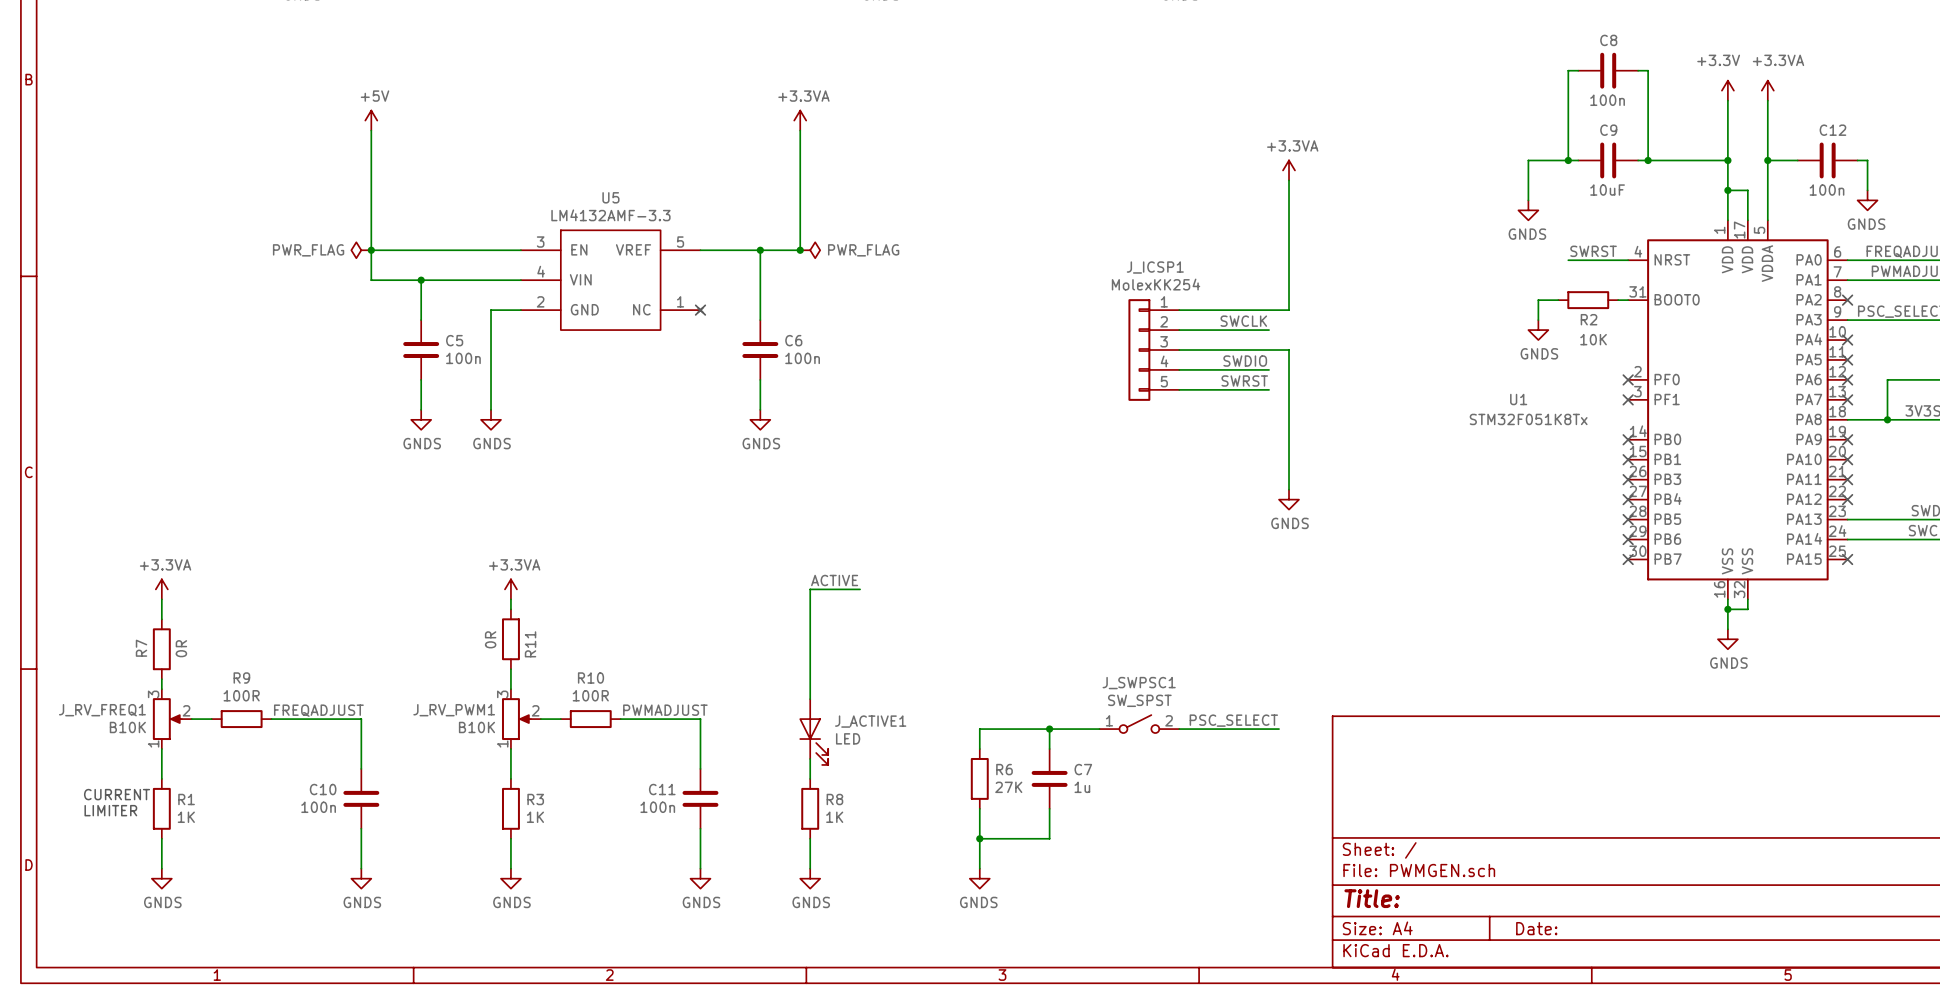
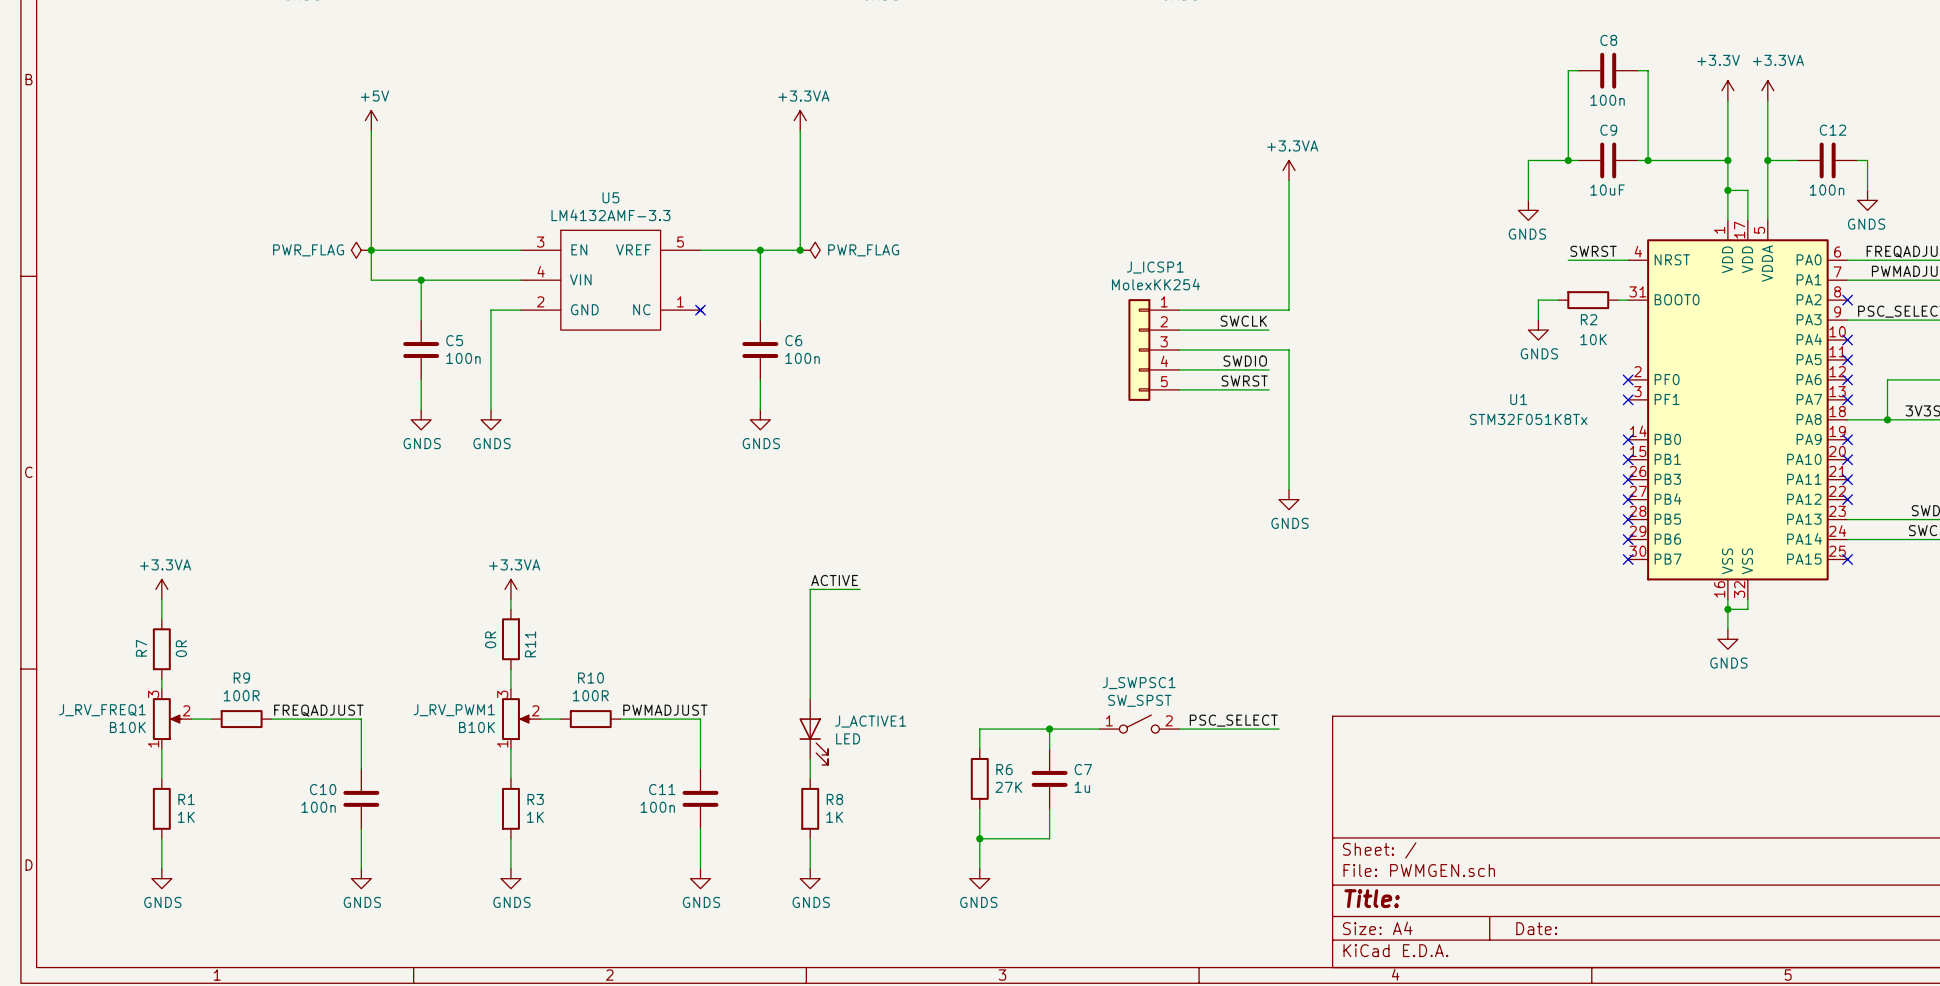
text: CURRENT (117, 794) -> none
text: LIMITER (110, 810) -> none

